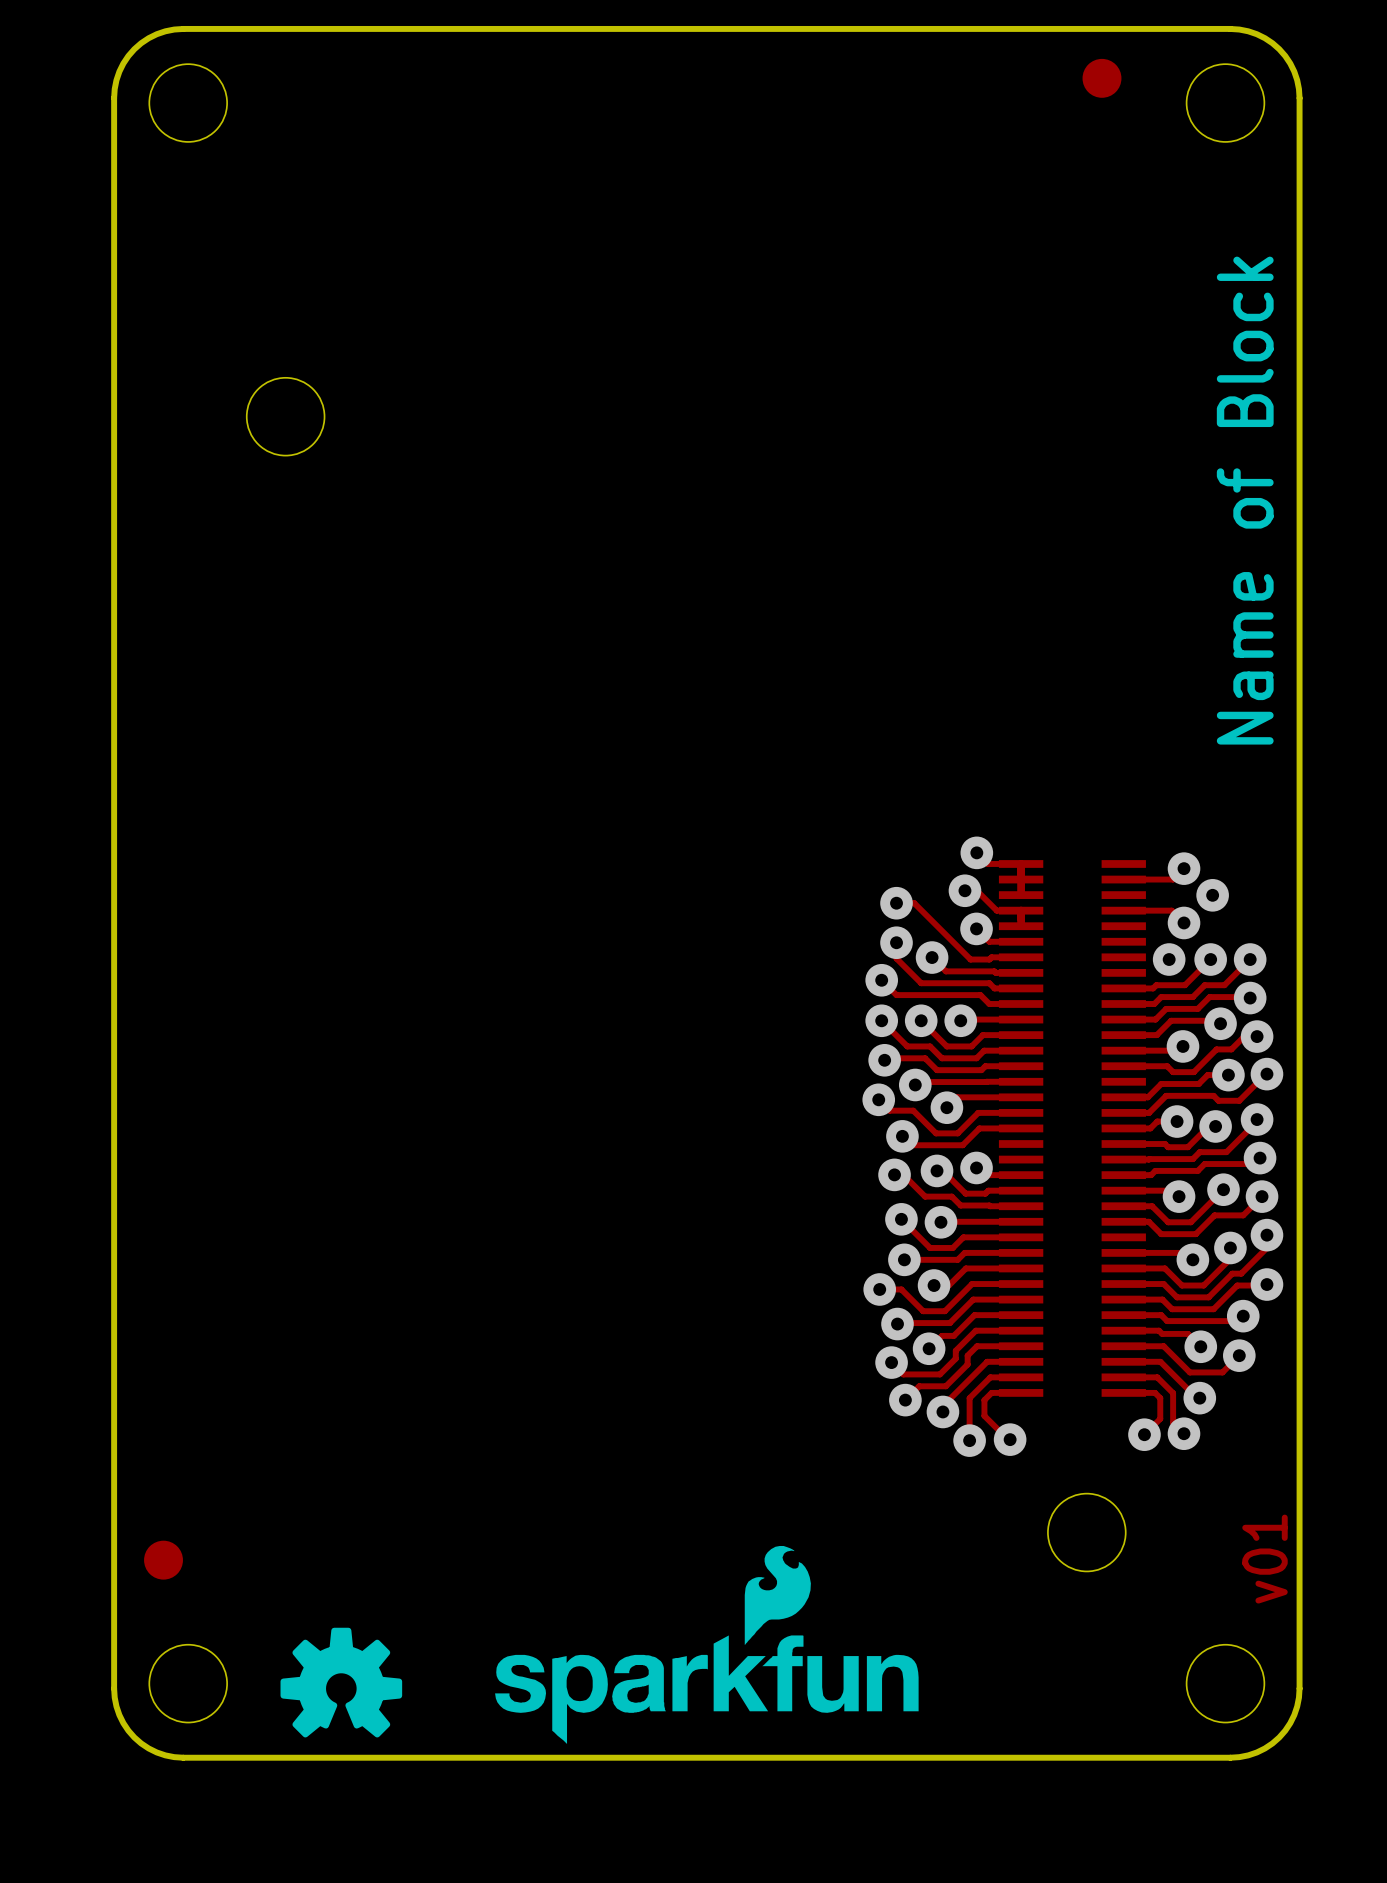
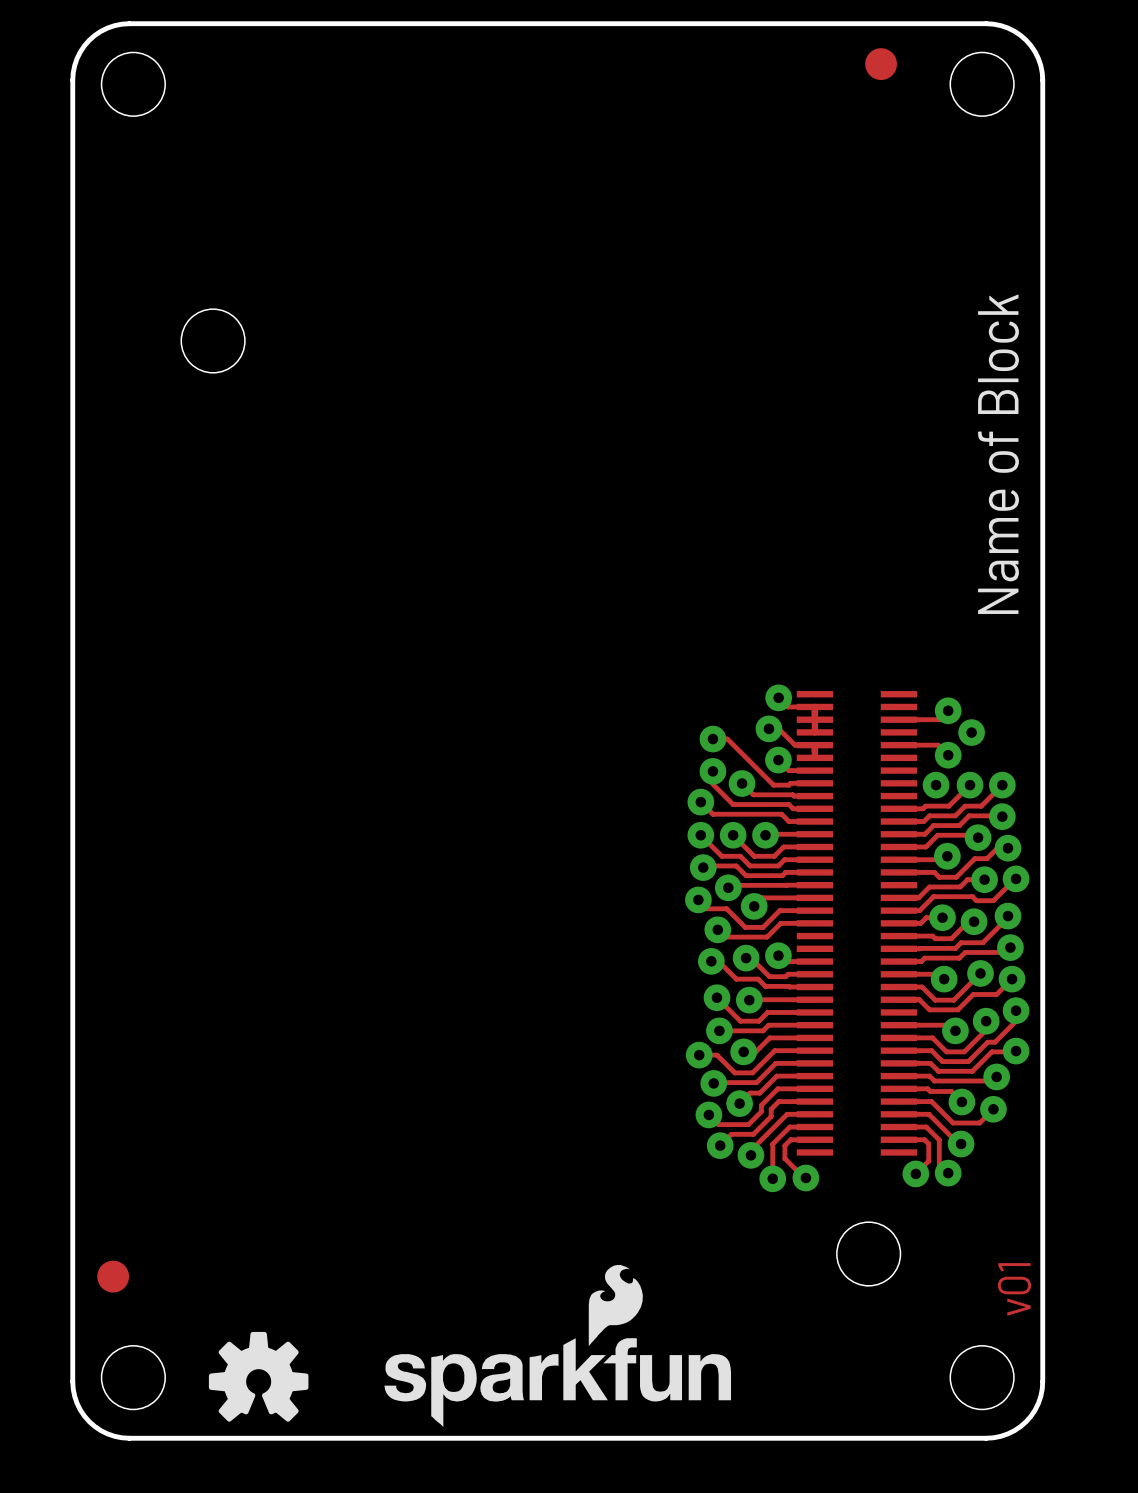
part footprint: [998, 860, 1146, 1397] -> [796, 691, 918, 1156]

